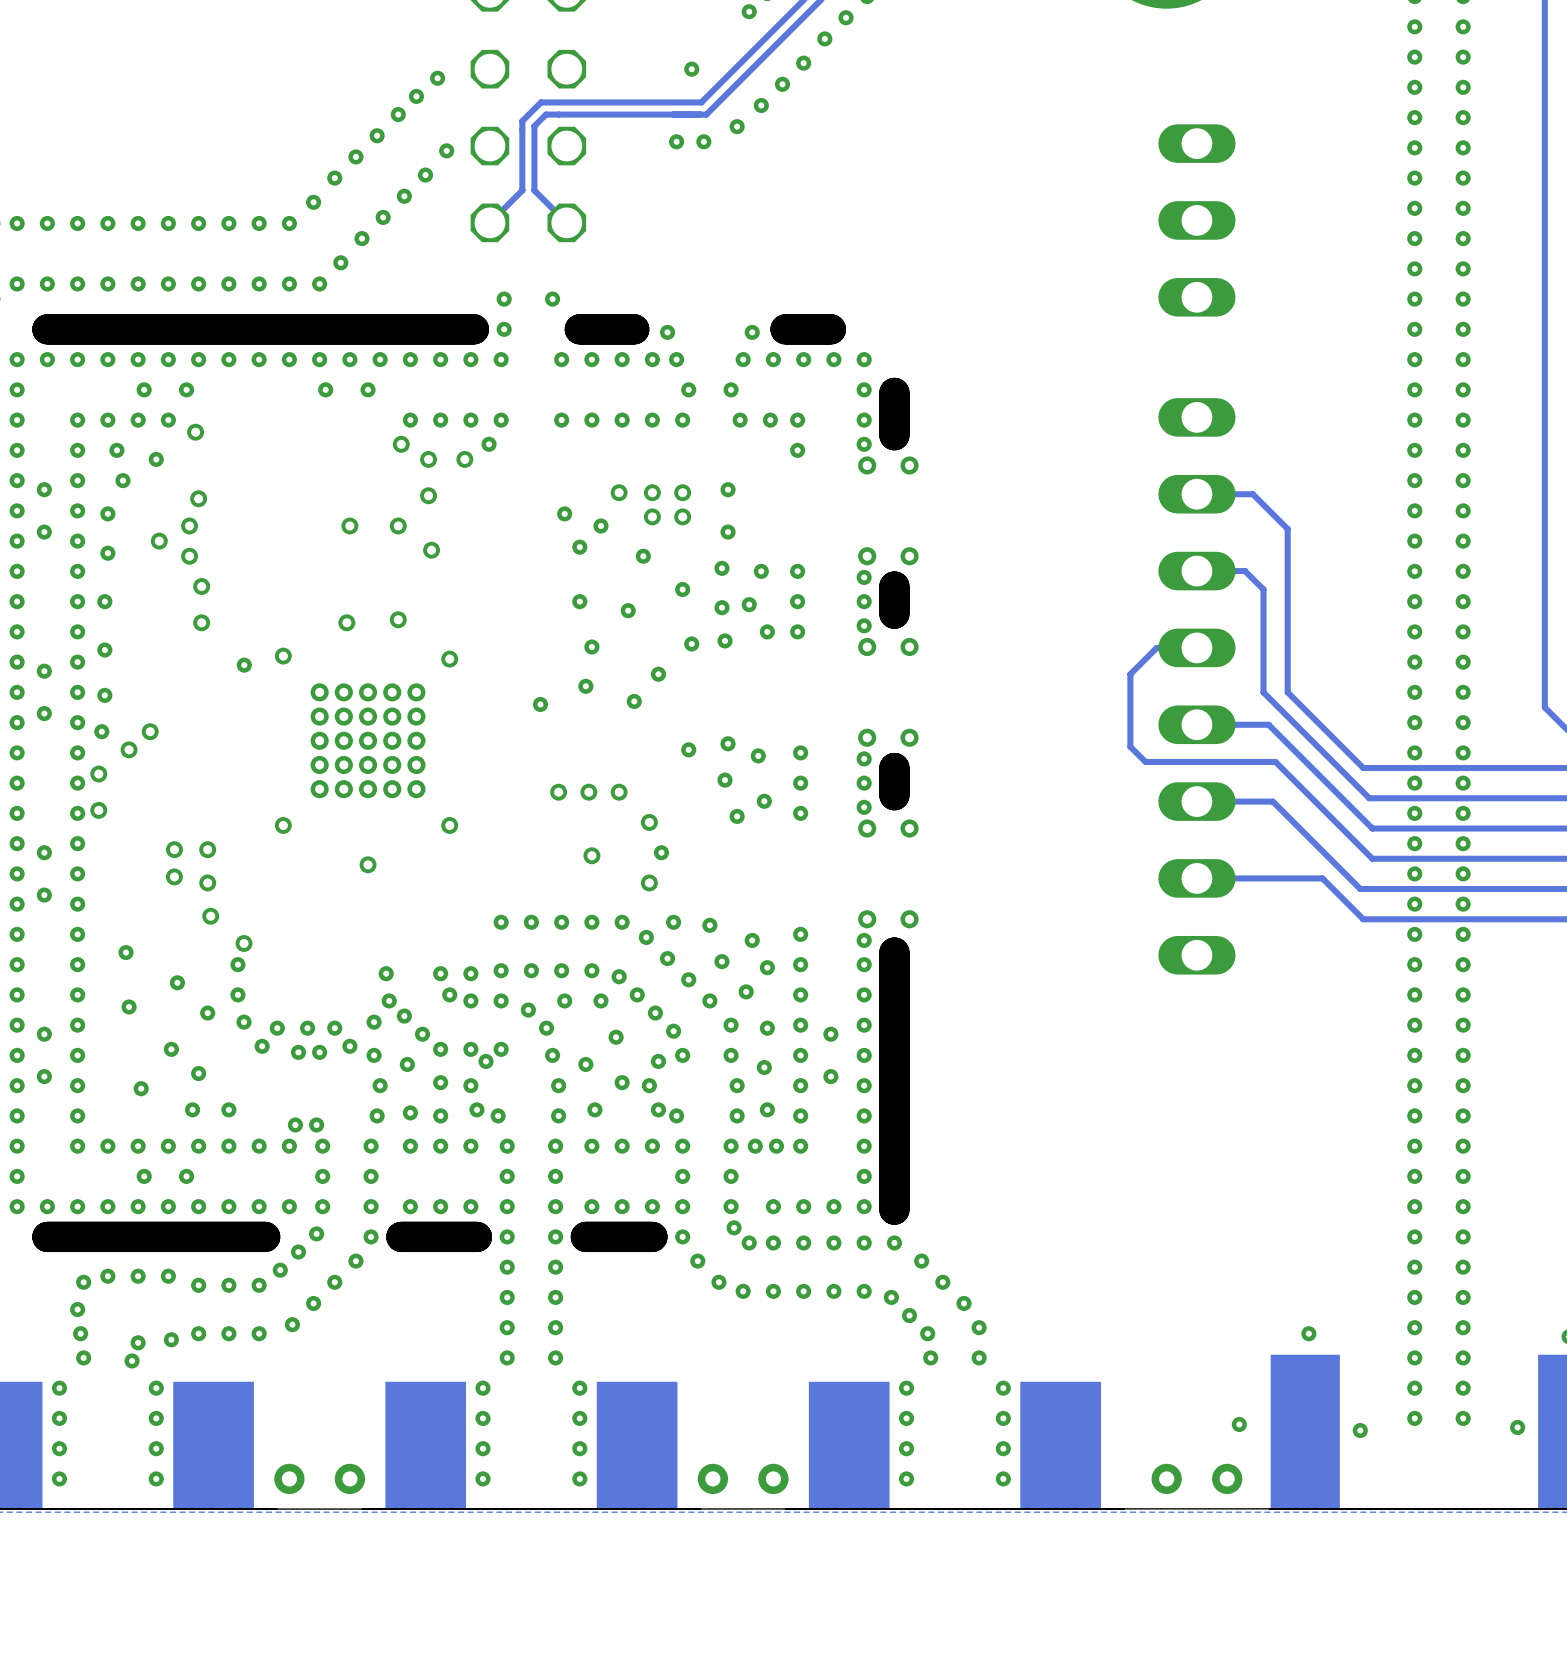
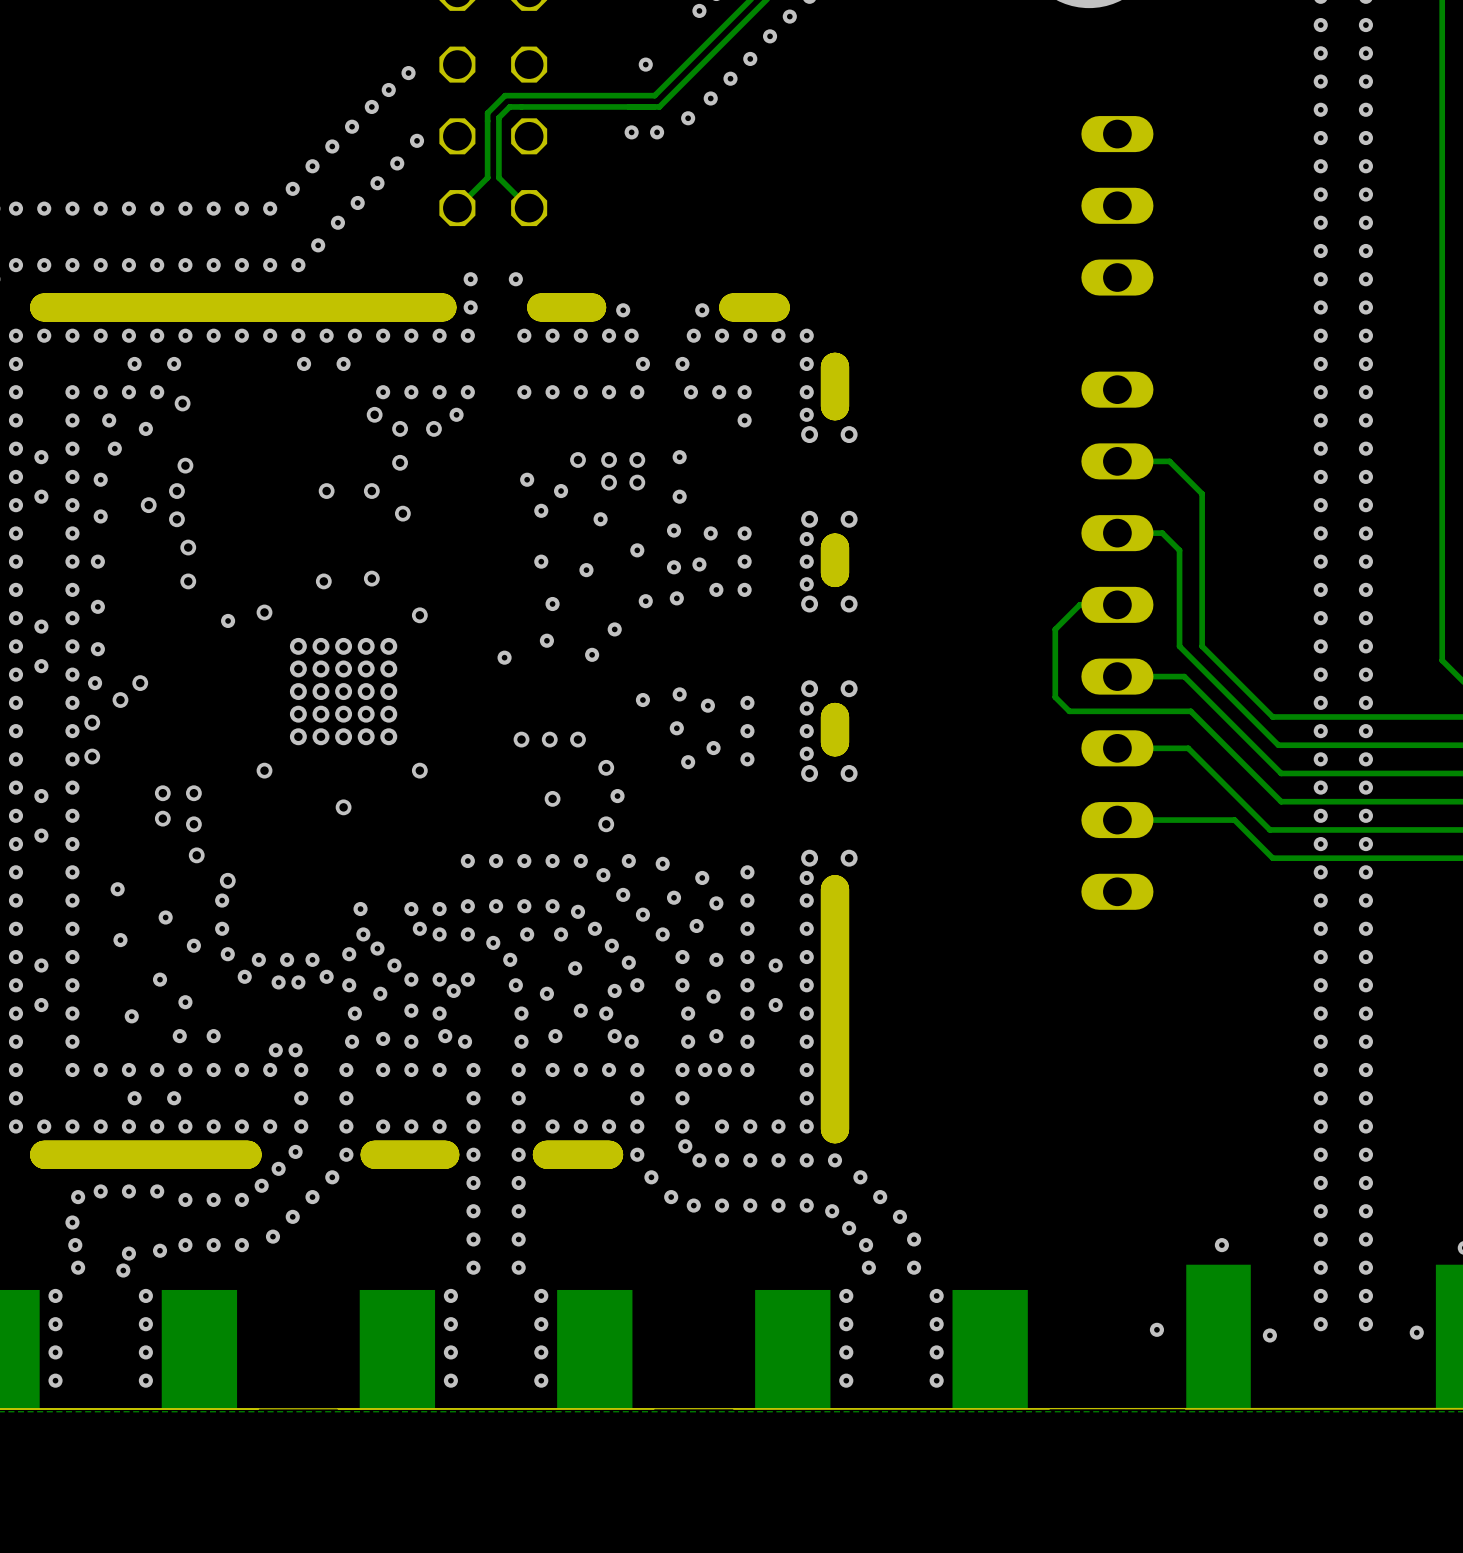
via: (289, 1478) -> none
via: (349, 1478) -> none
via: (712, 1478) -> none
via: (773, 1478) -> none
via: (1166, 1478) -> none
via: (1227, 1478) -> none

